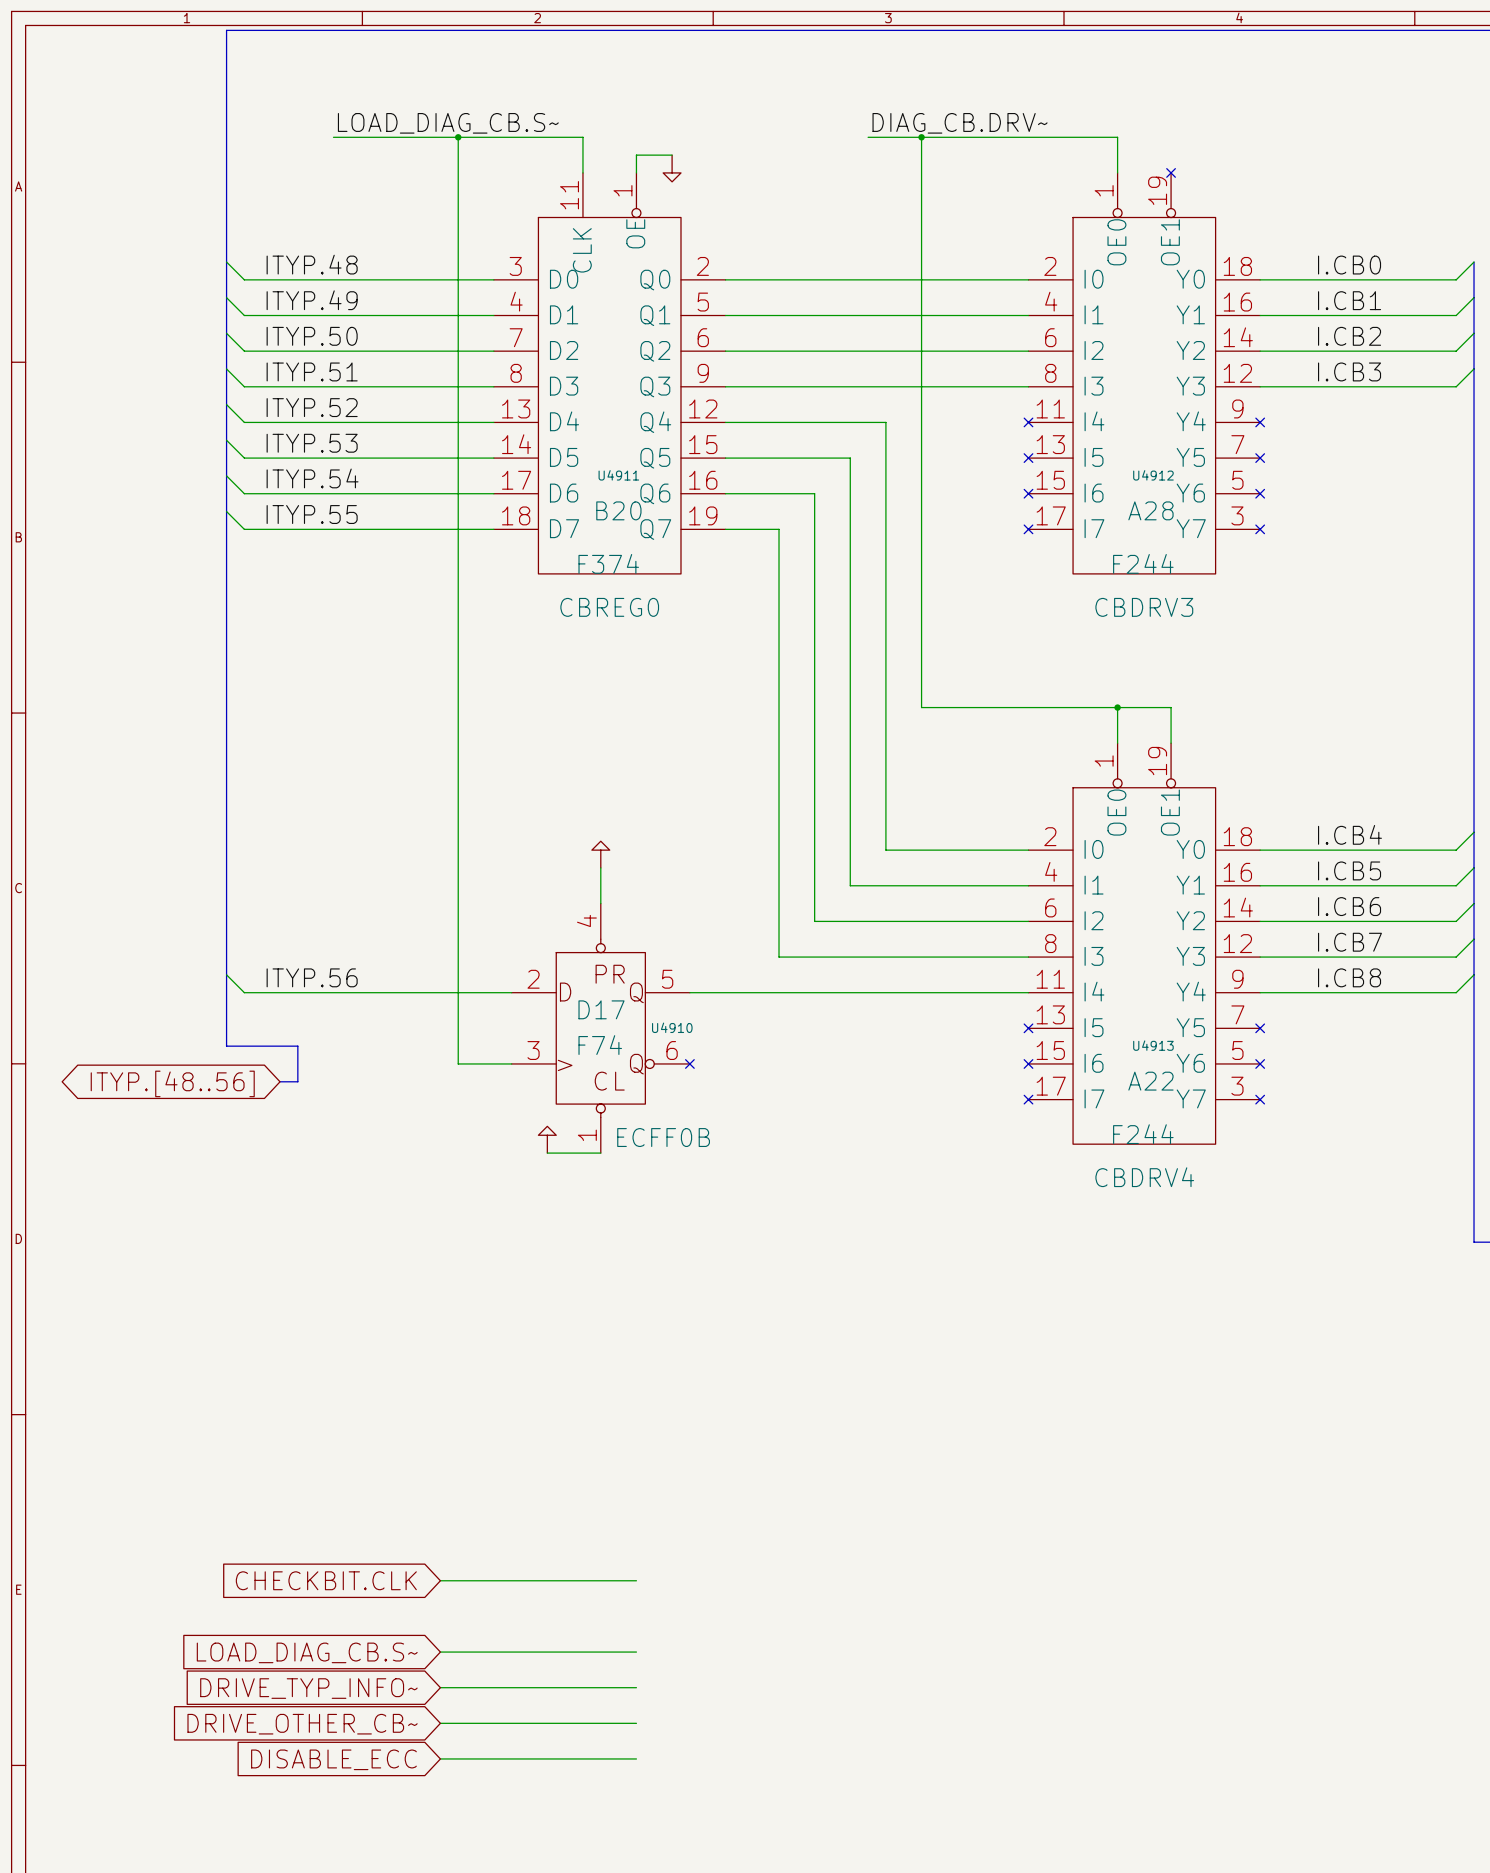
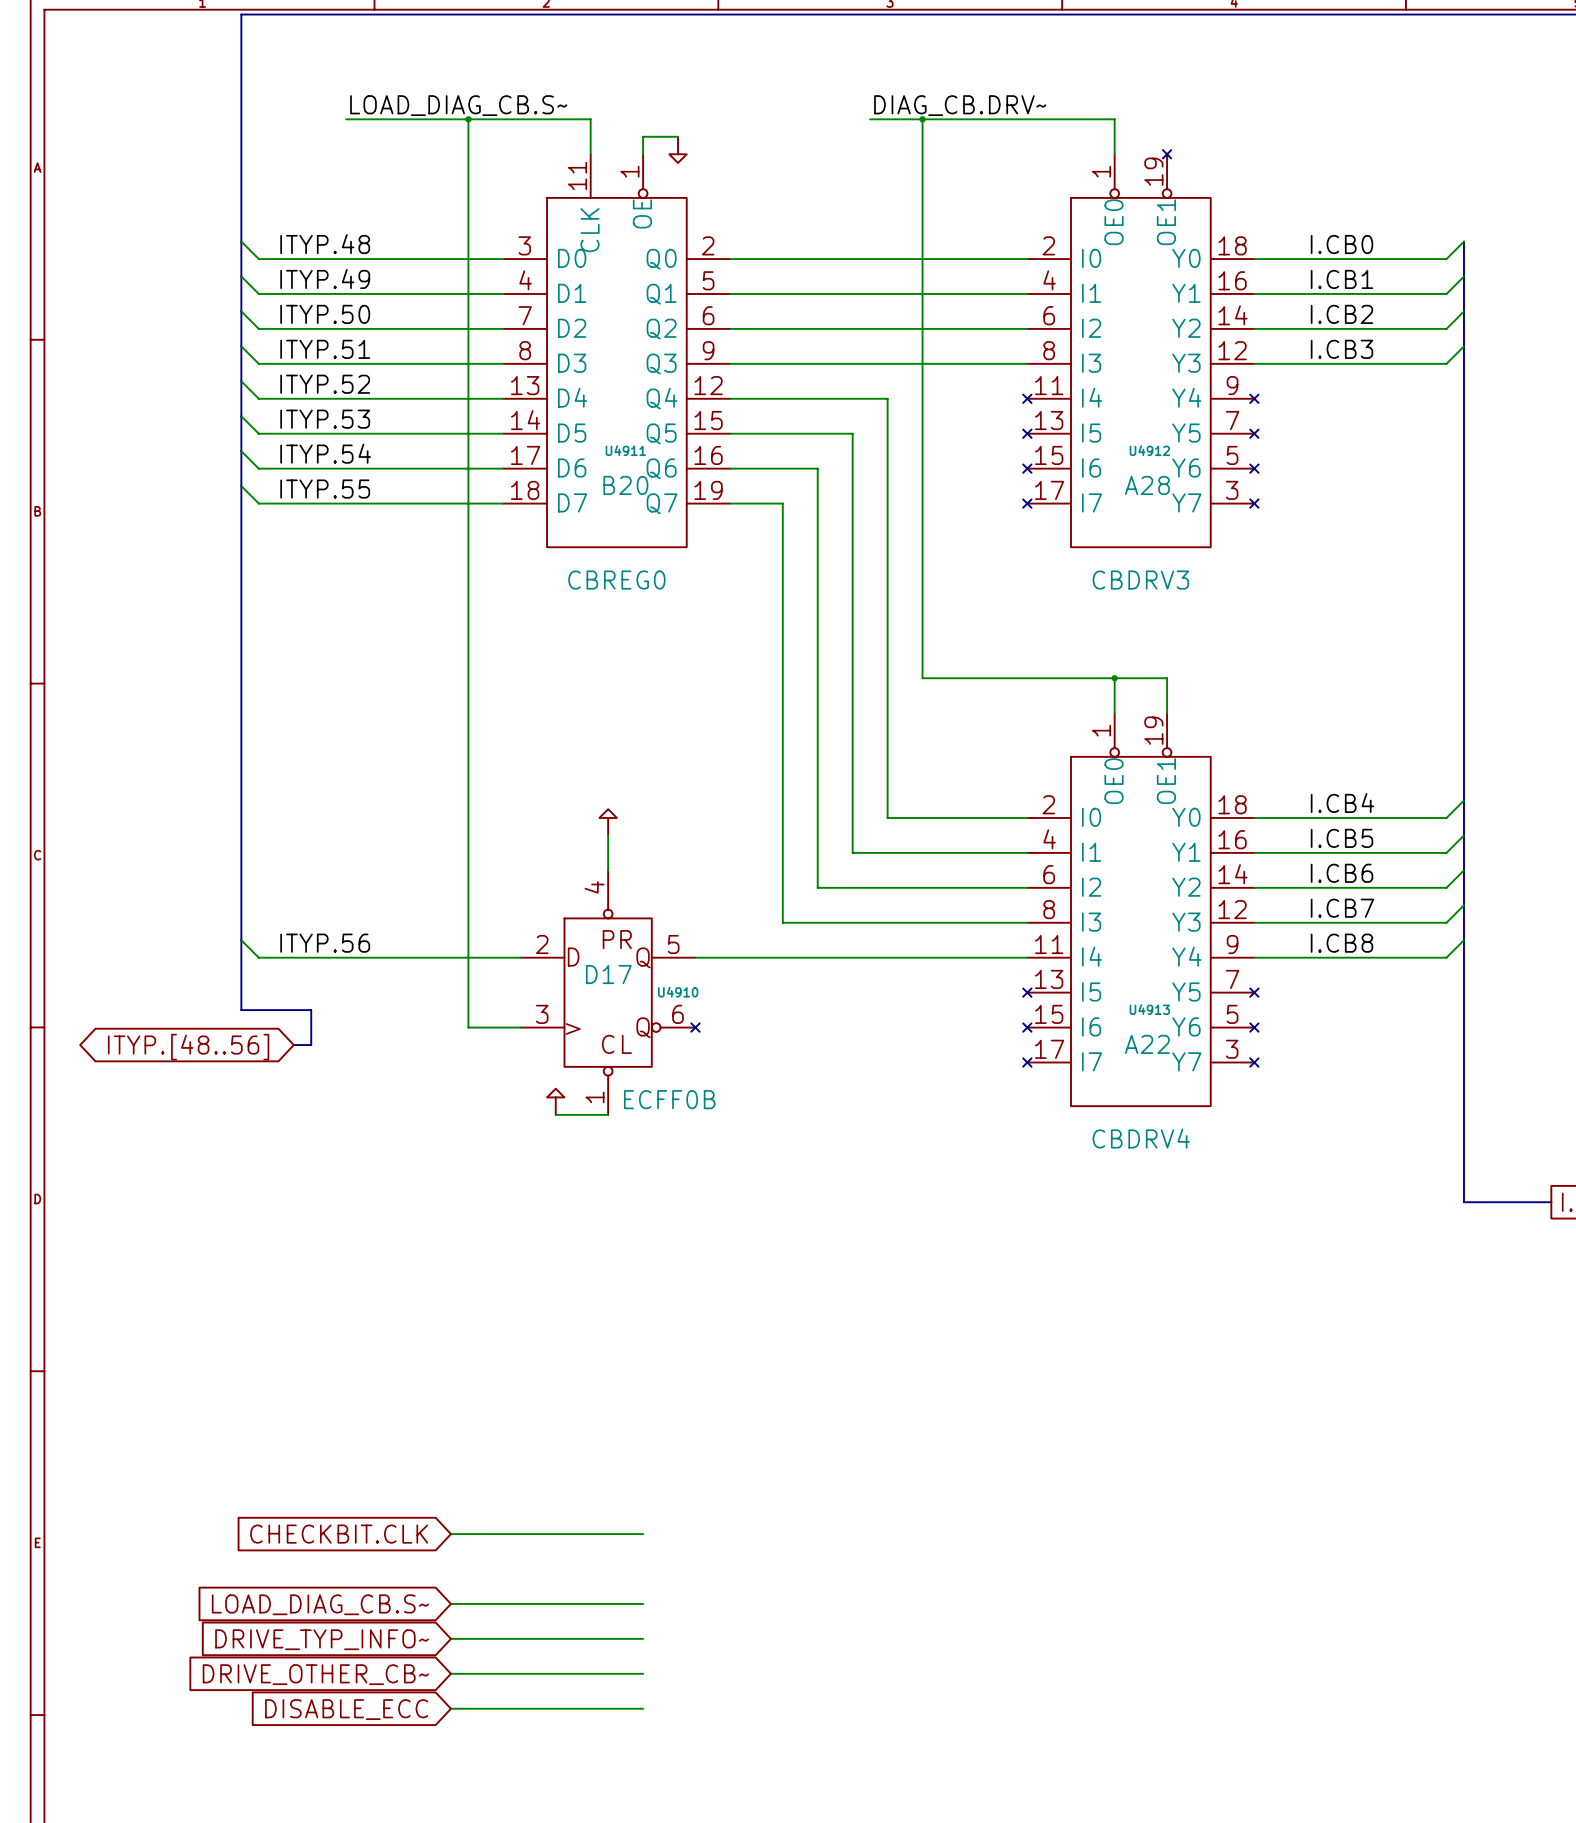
U4911 value: F374 (608, 563) -> none
U4912 value: F244 (1143, 563) -> none
U4910 value: F74 (600, 1045) -> none
U4913 value: F244 (1143, 1134) -> none

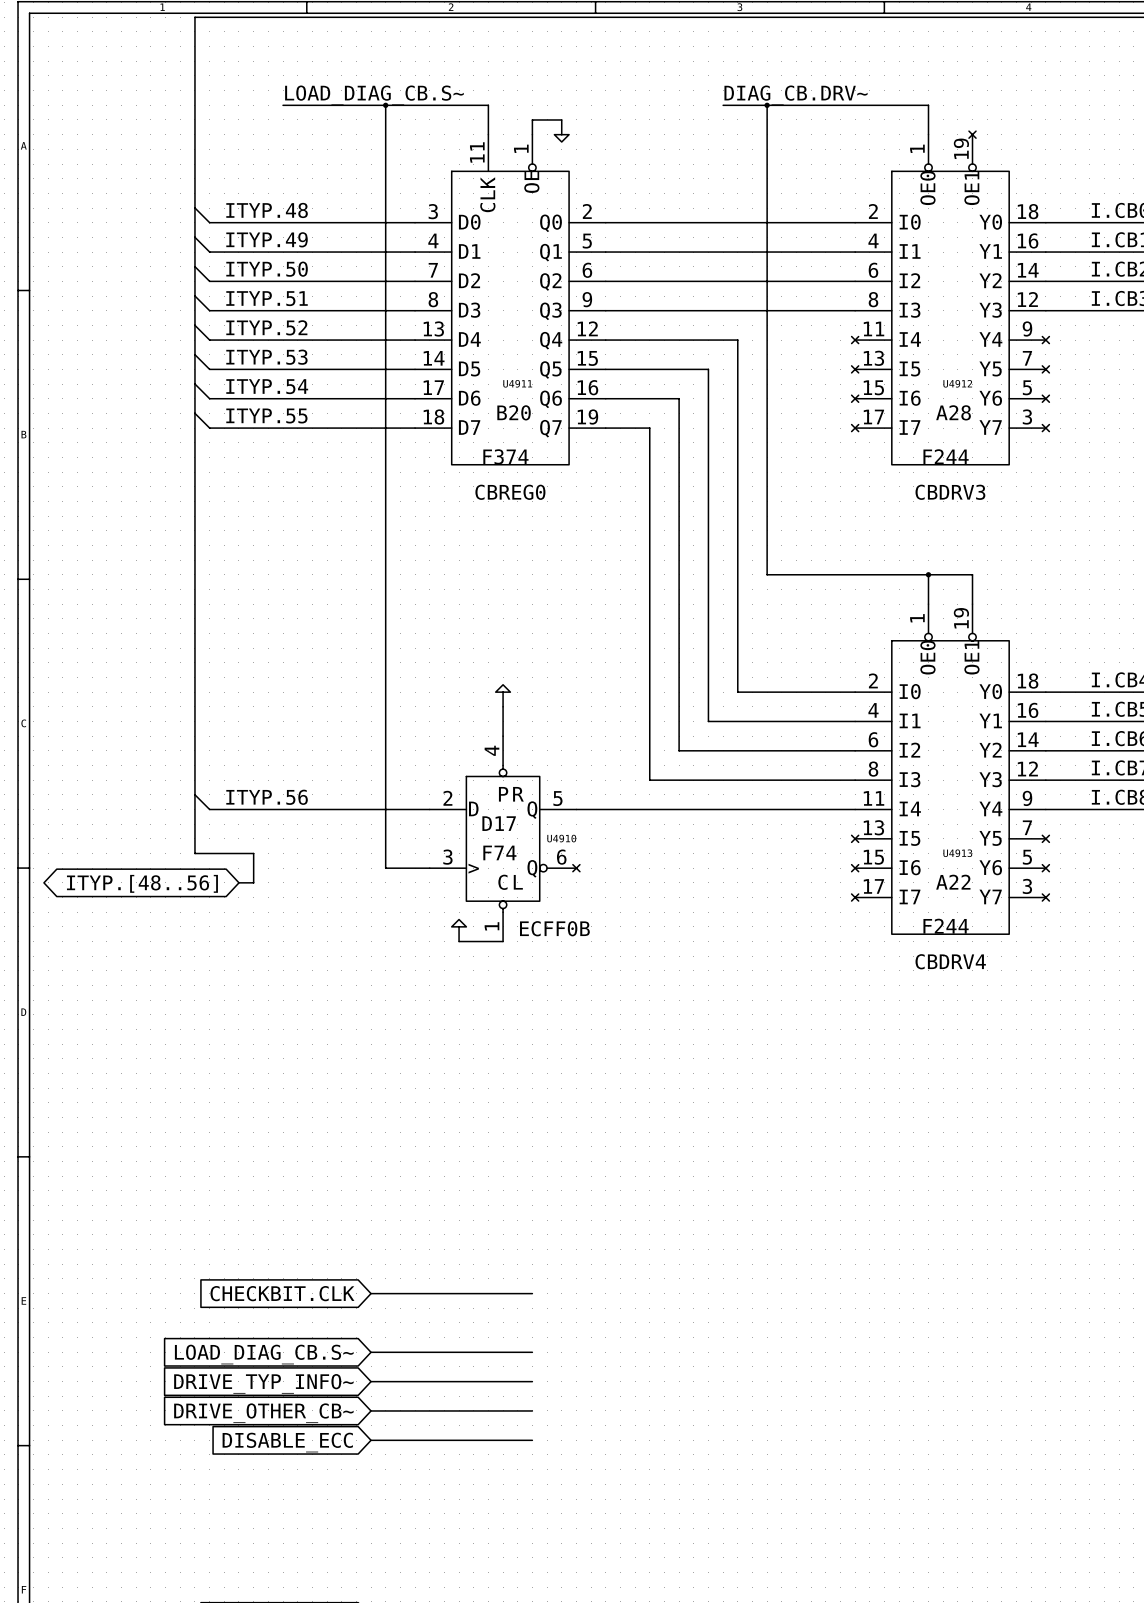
U4911 value: none -> F374 (505, 456)
U4912 value: none -> F244 (946, 456)
U4910 value: none -> F74 (499, 852)
U4913 value: none -> F244 (946, 926)

